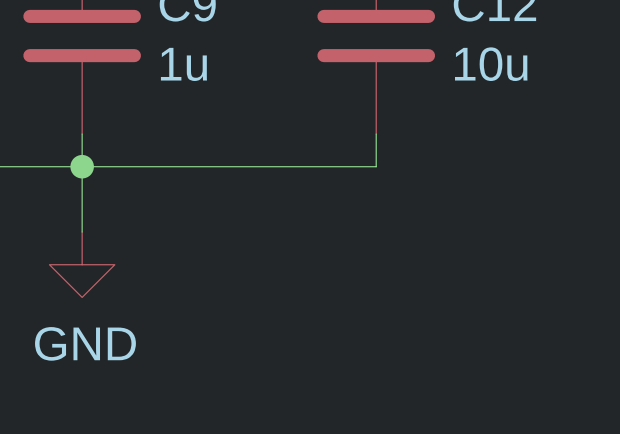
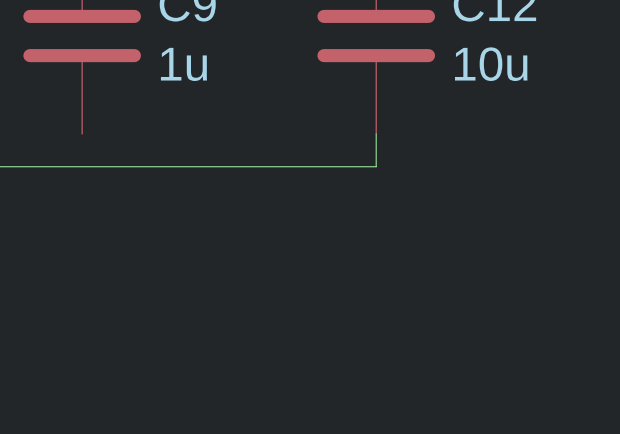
wire: (82, 134) (82, 232) -> none
junction: (82, 166) -> none
power symbol: GND (82, 264) -> none

